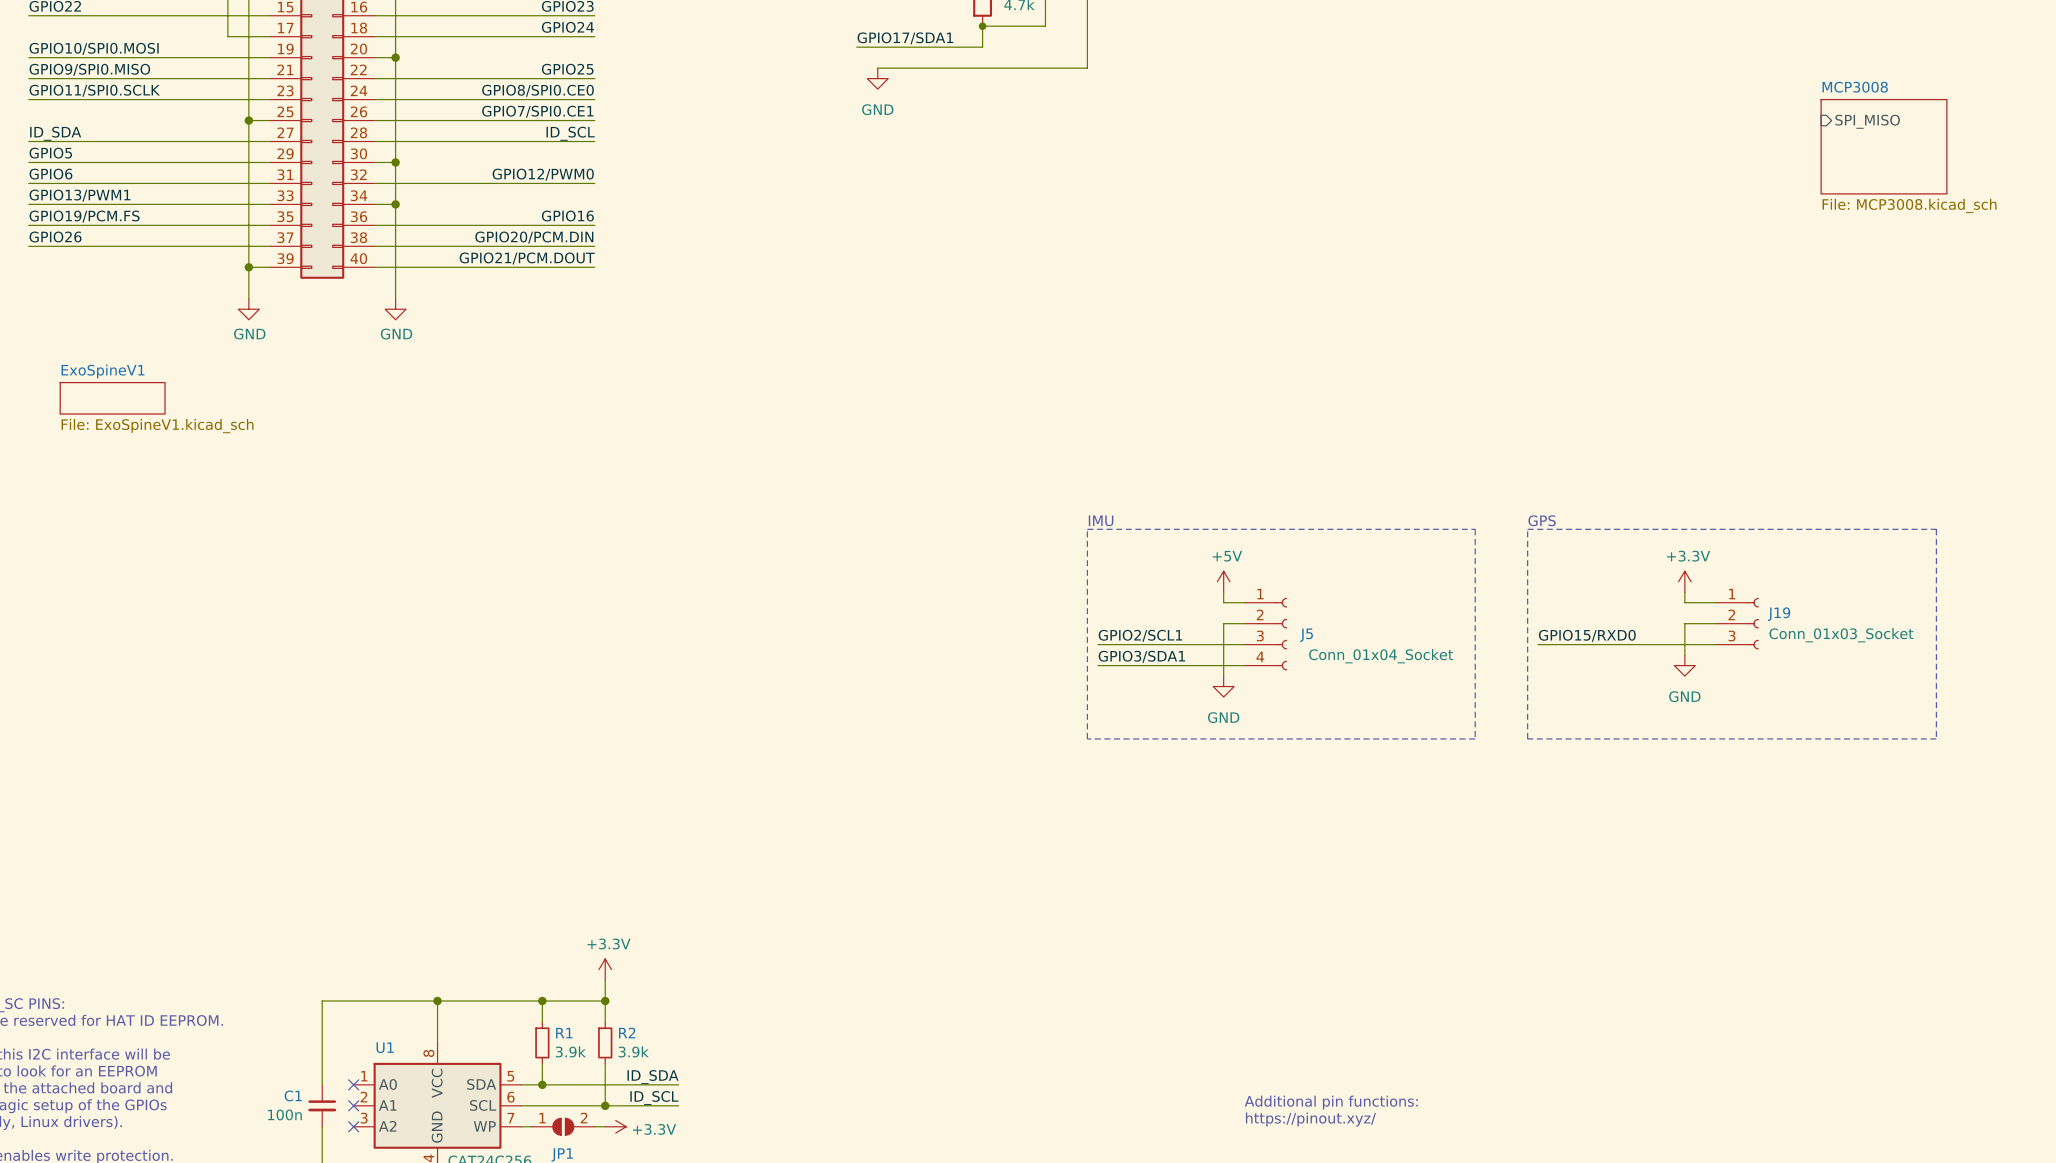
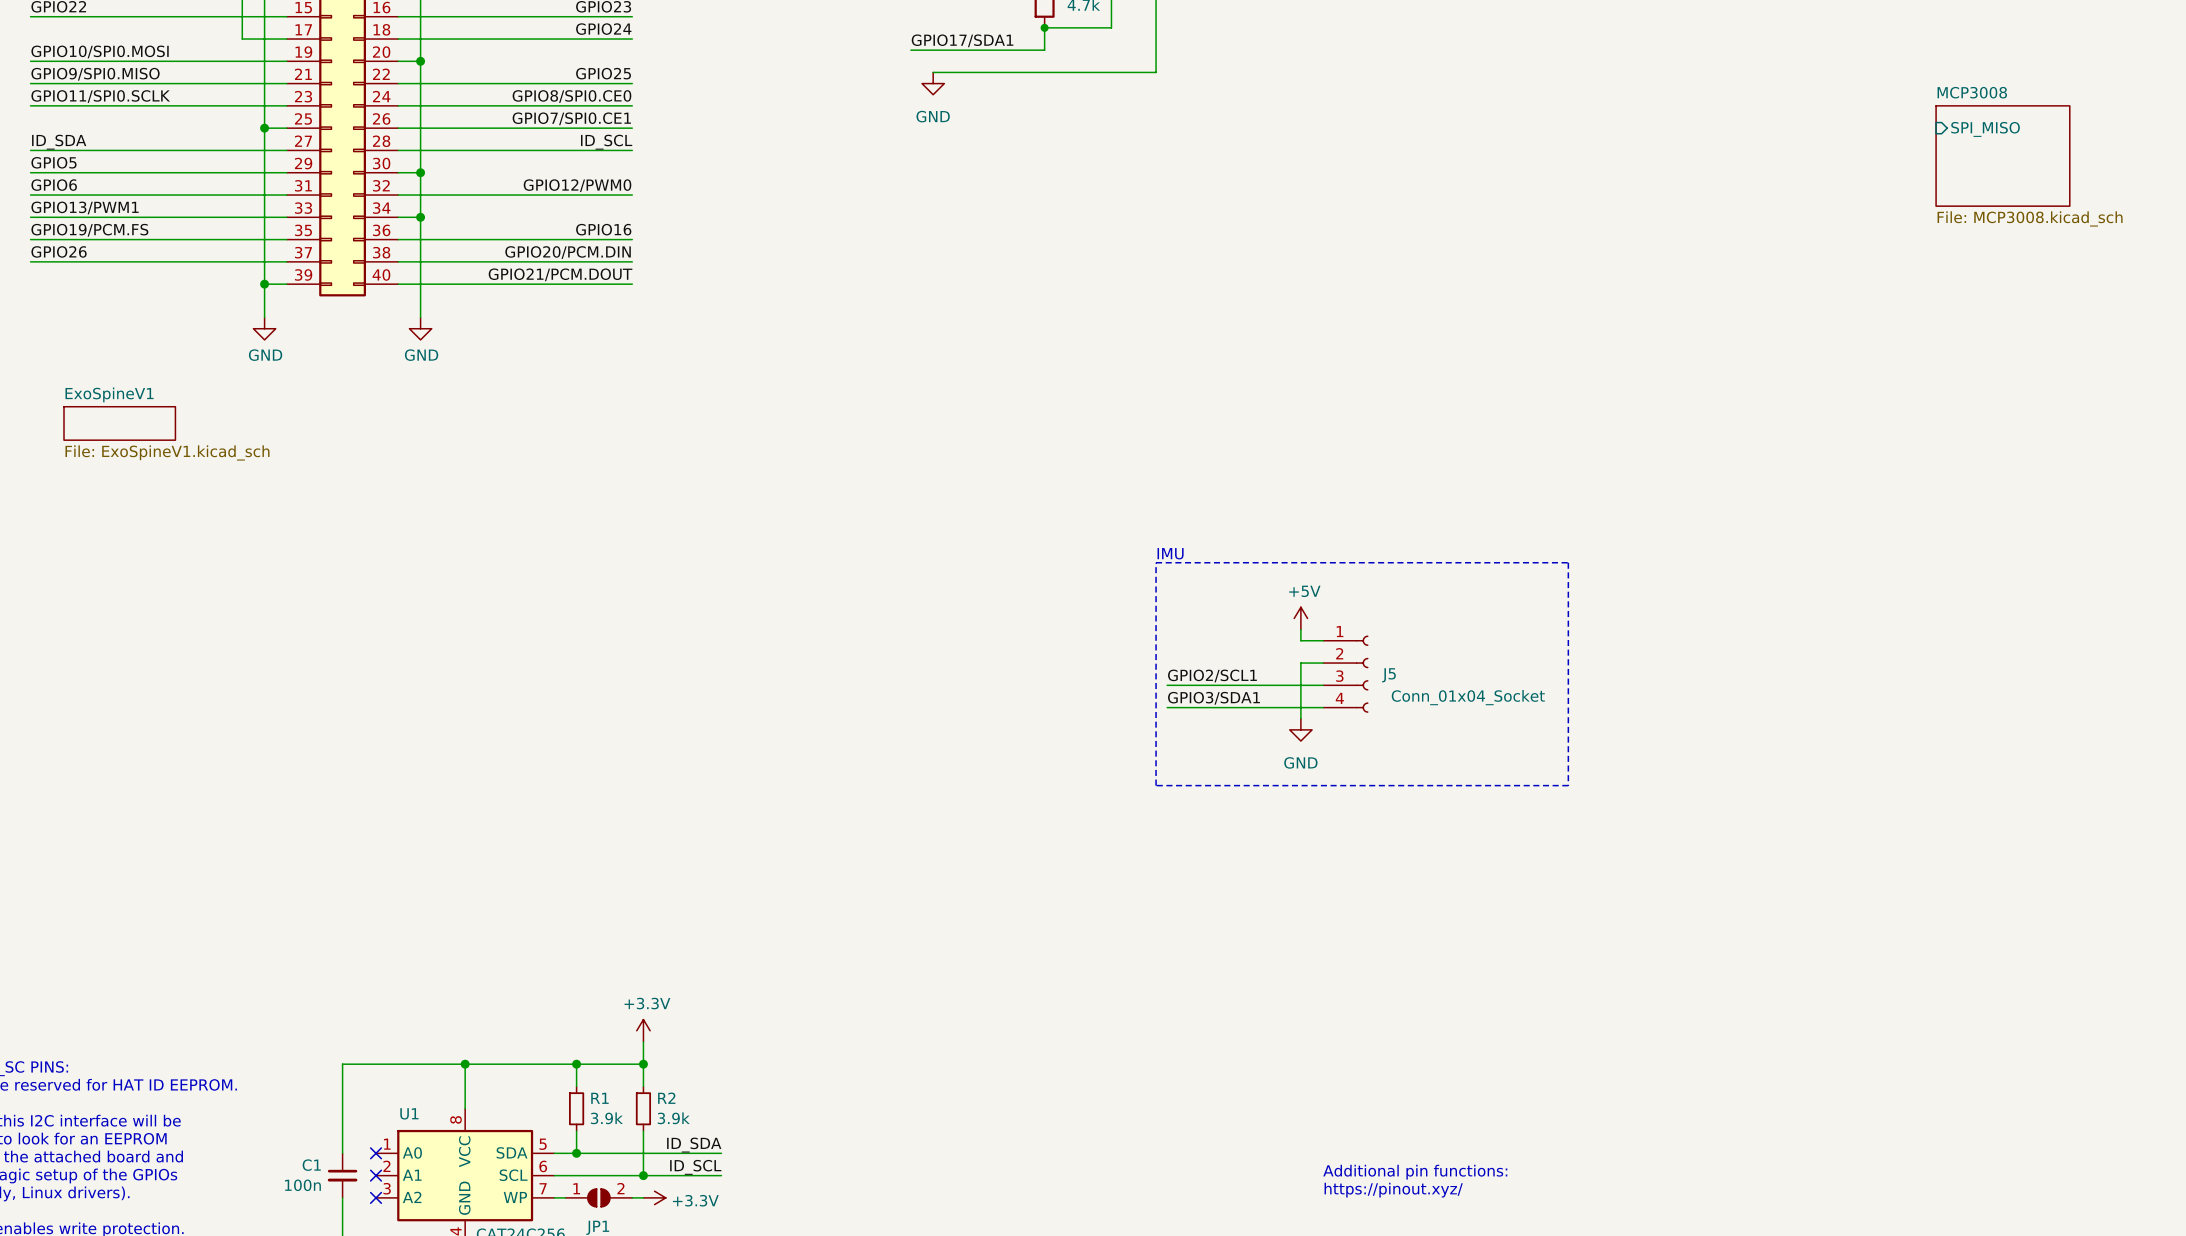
text: GPS (1542, 520) -> none
line: (1527, 529) (1936, 529) (1936, 738) (1527, 738) (1527, 529) -> none
power symbol: +3.3V (1684, 581) -> none
wire: (1684, 592) (1684, 602) (1716, 602) -> none
wire: (1716, 623) (1684, 623) (1684, 655) -> none
J19: Conn_01x03_Socket (1737, 623) -> none
label: GPIO15/RXD0 (1587, 635) -> none
wire: (1538, 644) (1716, 644) -> none
power symbol: GND (1684, 665) -> none

